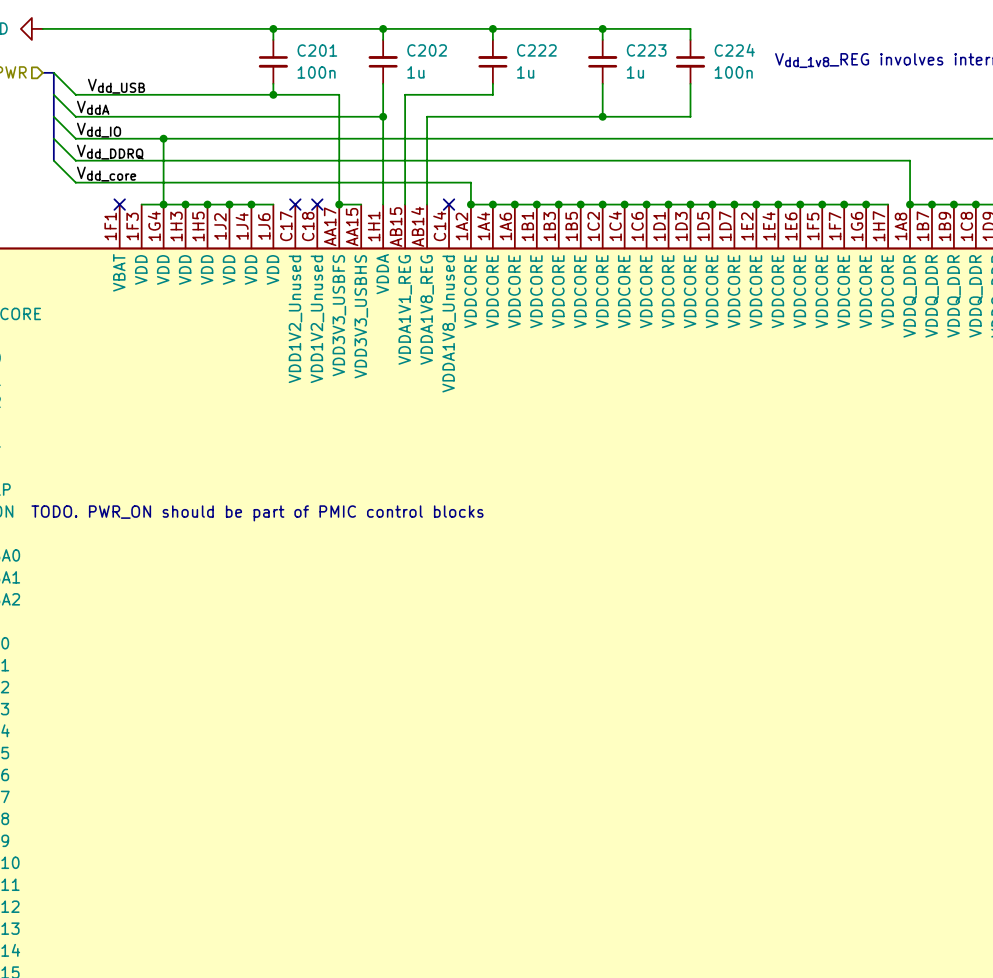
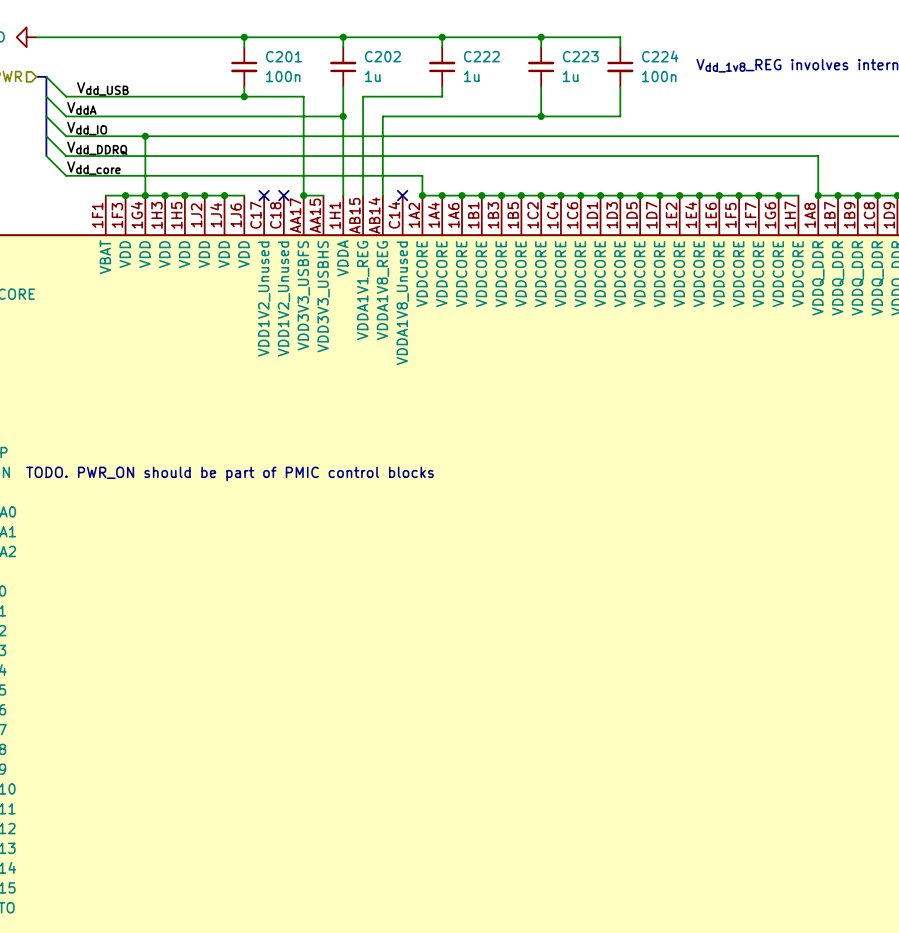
wire: none -> (105, 195) (125, 195)
no-connect mark: (119, 204) -> none
junction: none -> (125, 195)

